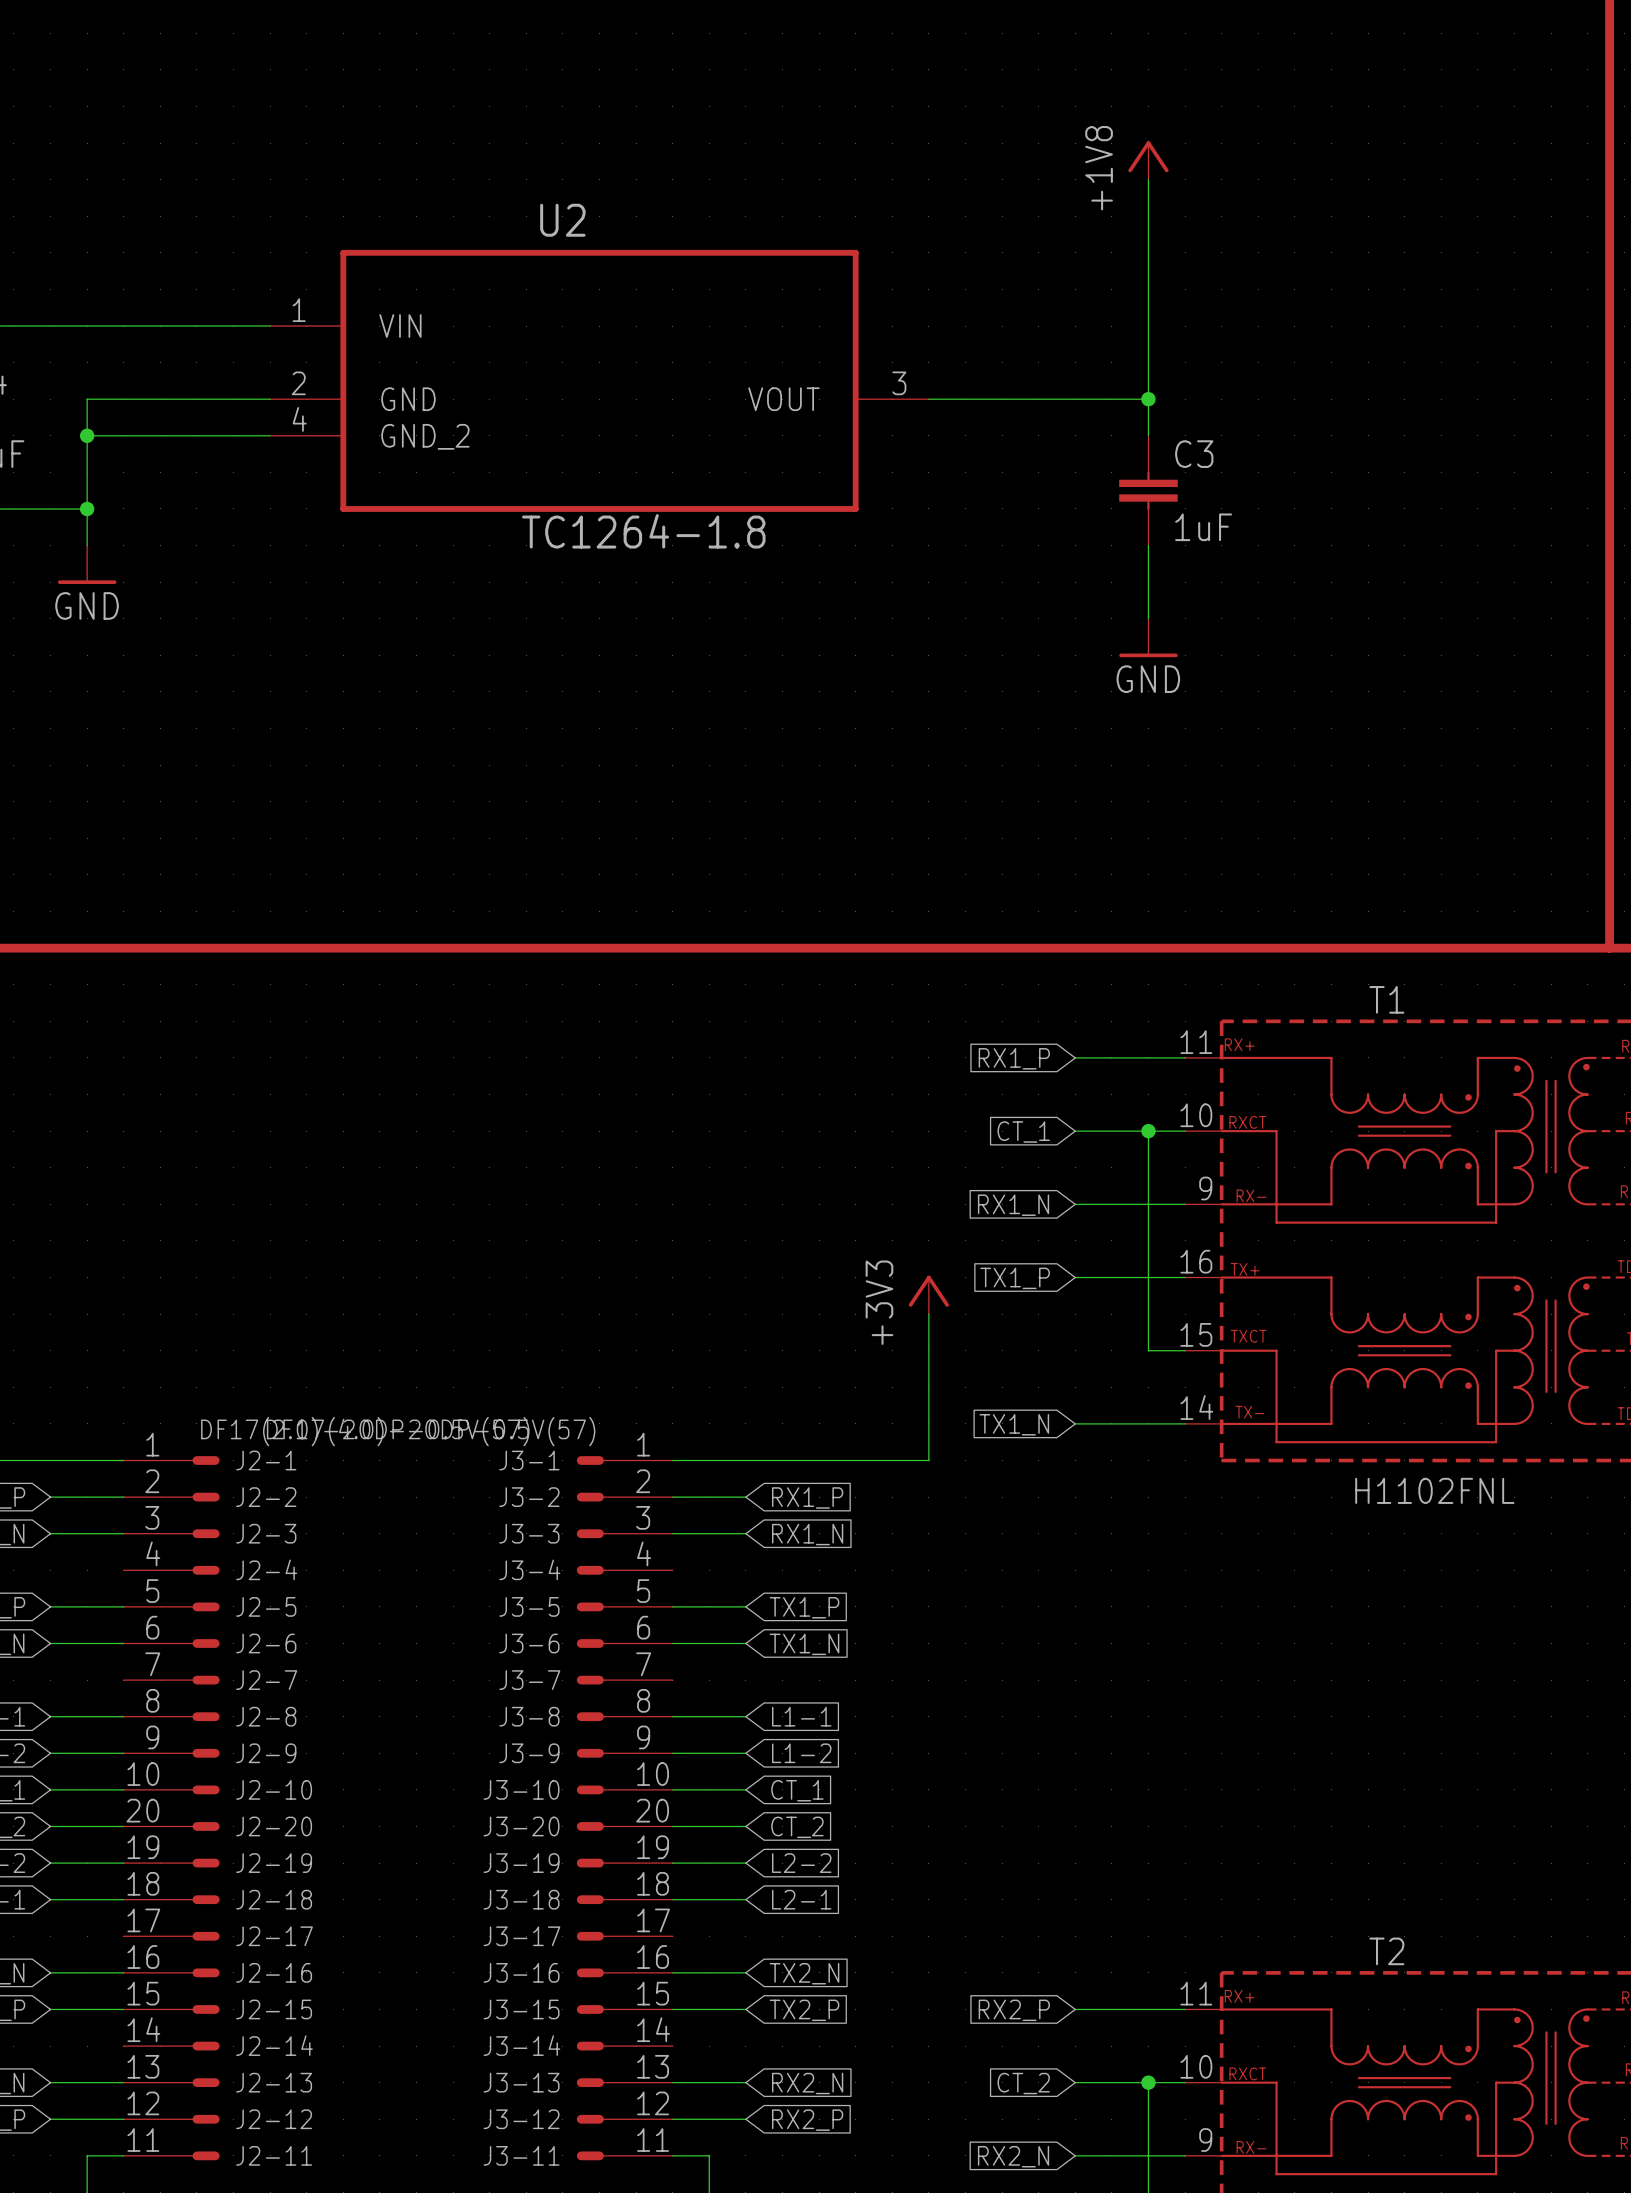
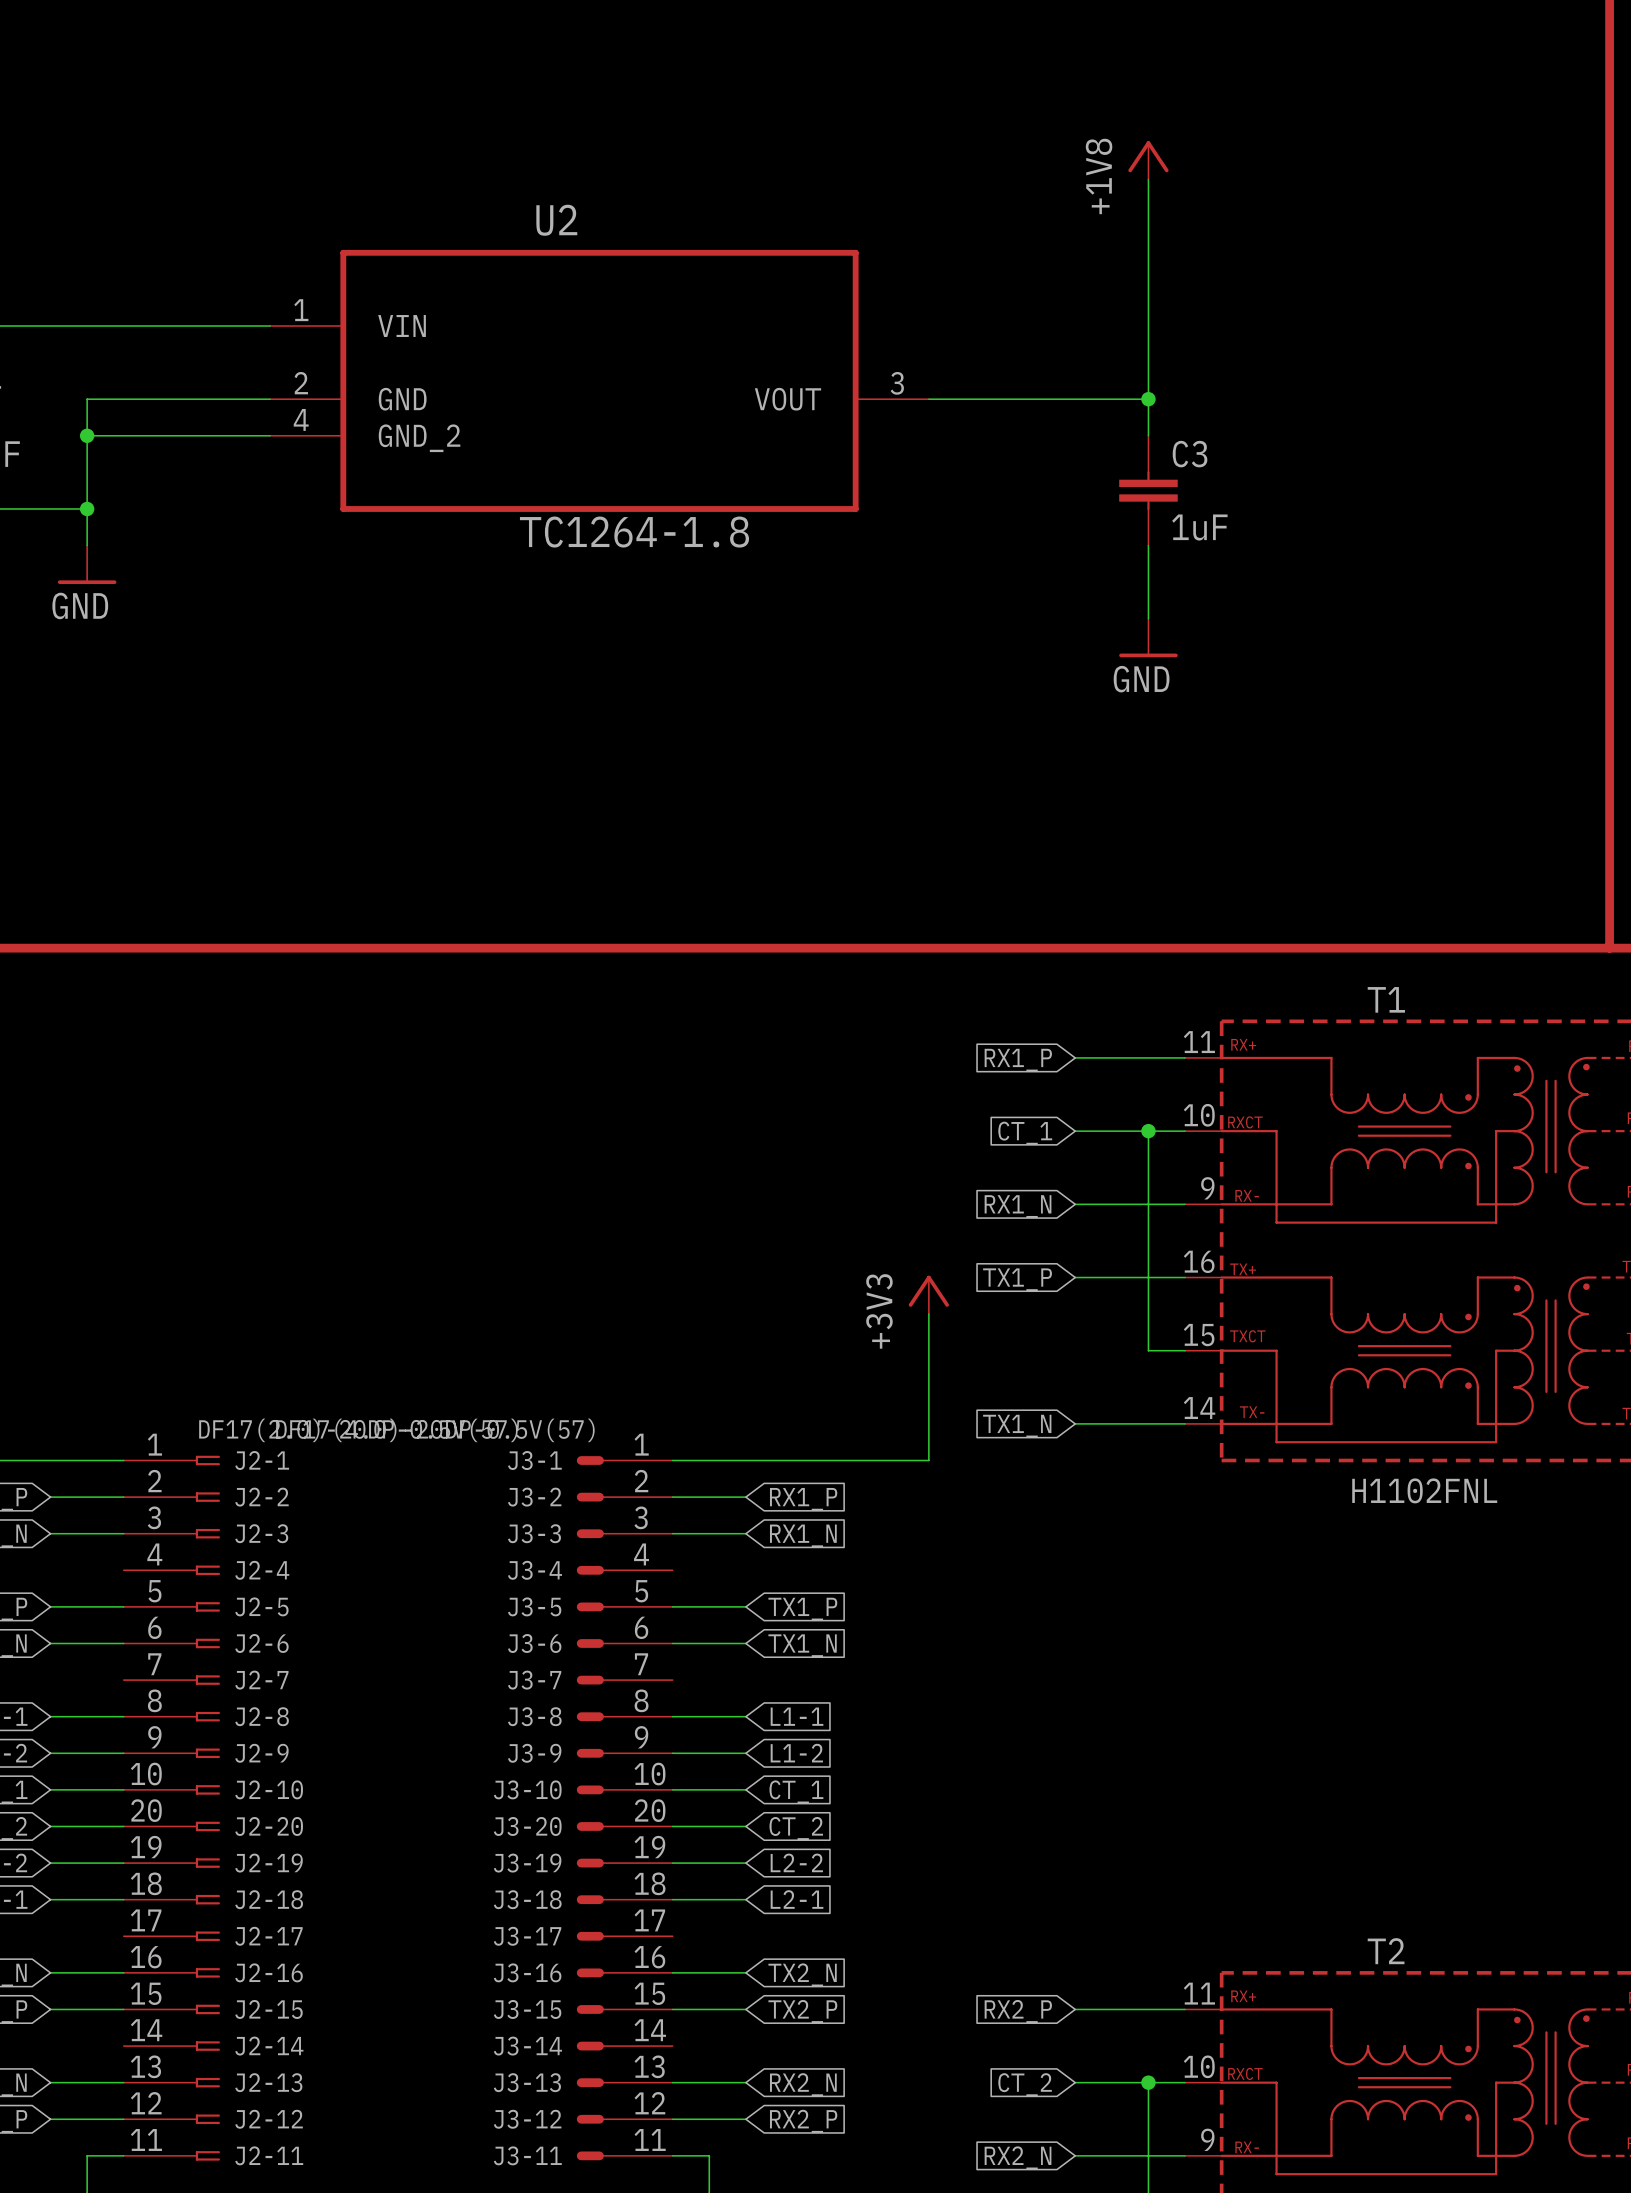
J2-1 symbol: [123, 1456, 220, 1465] -> [123, 1455, 220, 1466]
J2-2 symbol: [123, 1492, 220, 1502] -> [123, 1492, 220, 1502]
J2-3 symbol: [123, 1529, 220, 1539] -> [123, 1528, 220, 1539]
J2-4 symbol: [123, 1565, 220, 1575] -> [123, 1565, 220, 1576]
J2-5 symbol: [123, 1602, 220, 1612] -> [123, 1602, 220, 1612]
J2-6 symbol: [123, 1639, 220, 1648] -> [123, 1638, 220, 1649]
J2-7 symbol: [123, 1675, 220, 1685] -> [123, 1675, 220, 1685]
J2-8 symbol: [123, 1712, 220, 1722] -> [123, 1711, 220, 1722]
J2-9 symbol: [123, 1748, 220, 1758] -> [123, 1748, 220, 1759]
J2-10 symbol: [123, 1785, 220, 1795] -> [123, 1785, 220, 1795]
J2-20 symbol: [123, 1822, 220, 1831] -> [123, 1821, 220, 1832]
J2-19 symbol: [123, 1858, 220, 1868] -> [123, 1858, 220, 1868]
J2-18 symbol: [123, 1895, 220, 1905] -> [123, 1894, 220, 1905]
J2-17 symbol: [123, 1931, 220, 1941] -> [123, 1931, 220, 1942]
J2-16 symbol: [123, 1968, 220, 1978] -> [123, 1968, 220, 1978]
J2-15 symbol: [123, 2005, 220, 2014] -> [123, 2004, 220, 2015]
J2-14 symbol: [123, 2041, 220, 2051] -> [123, 2041, 220, 2051]
J2-13 symbol: [123, 2078, 220, 2088] -> [123, 2077, 220, 2088]
J2-12 symbol: [123, 2114, 220, 2124] -> [123, 2114, 220, 2125]
J2-11 symbol: [123, 2151, 220, 2161] -> [123, 2151, 220, 2161]

